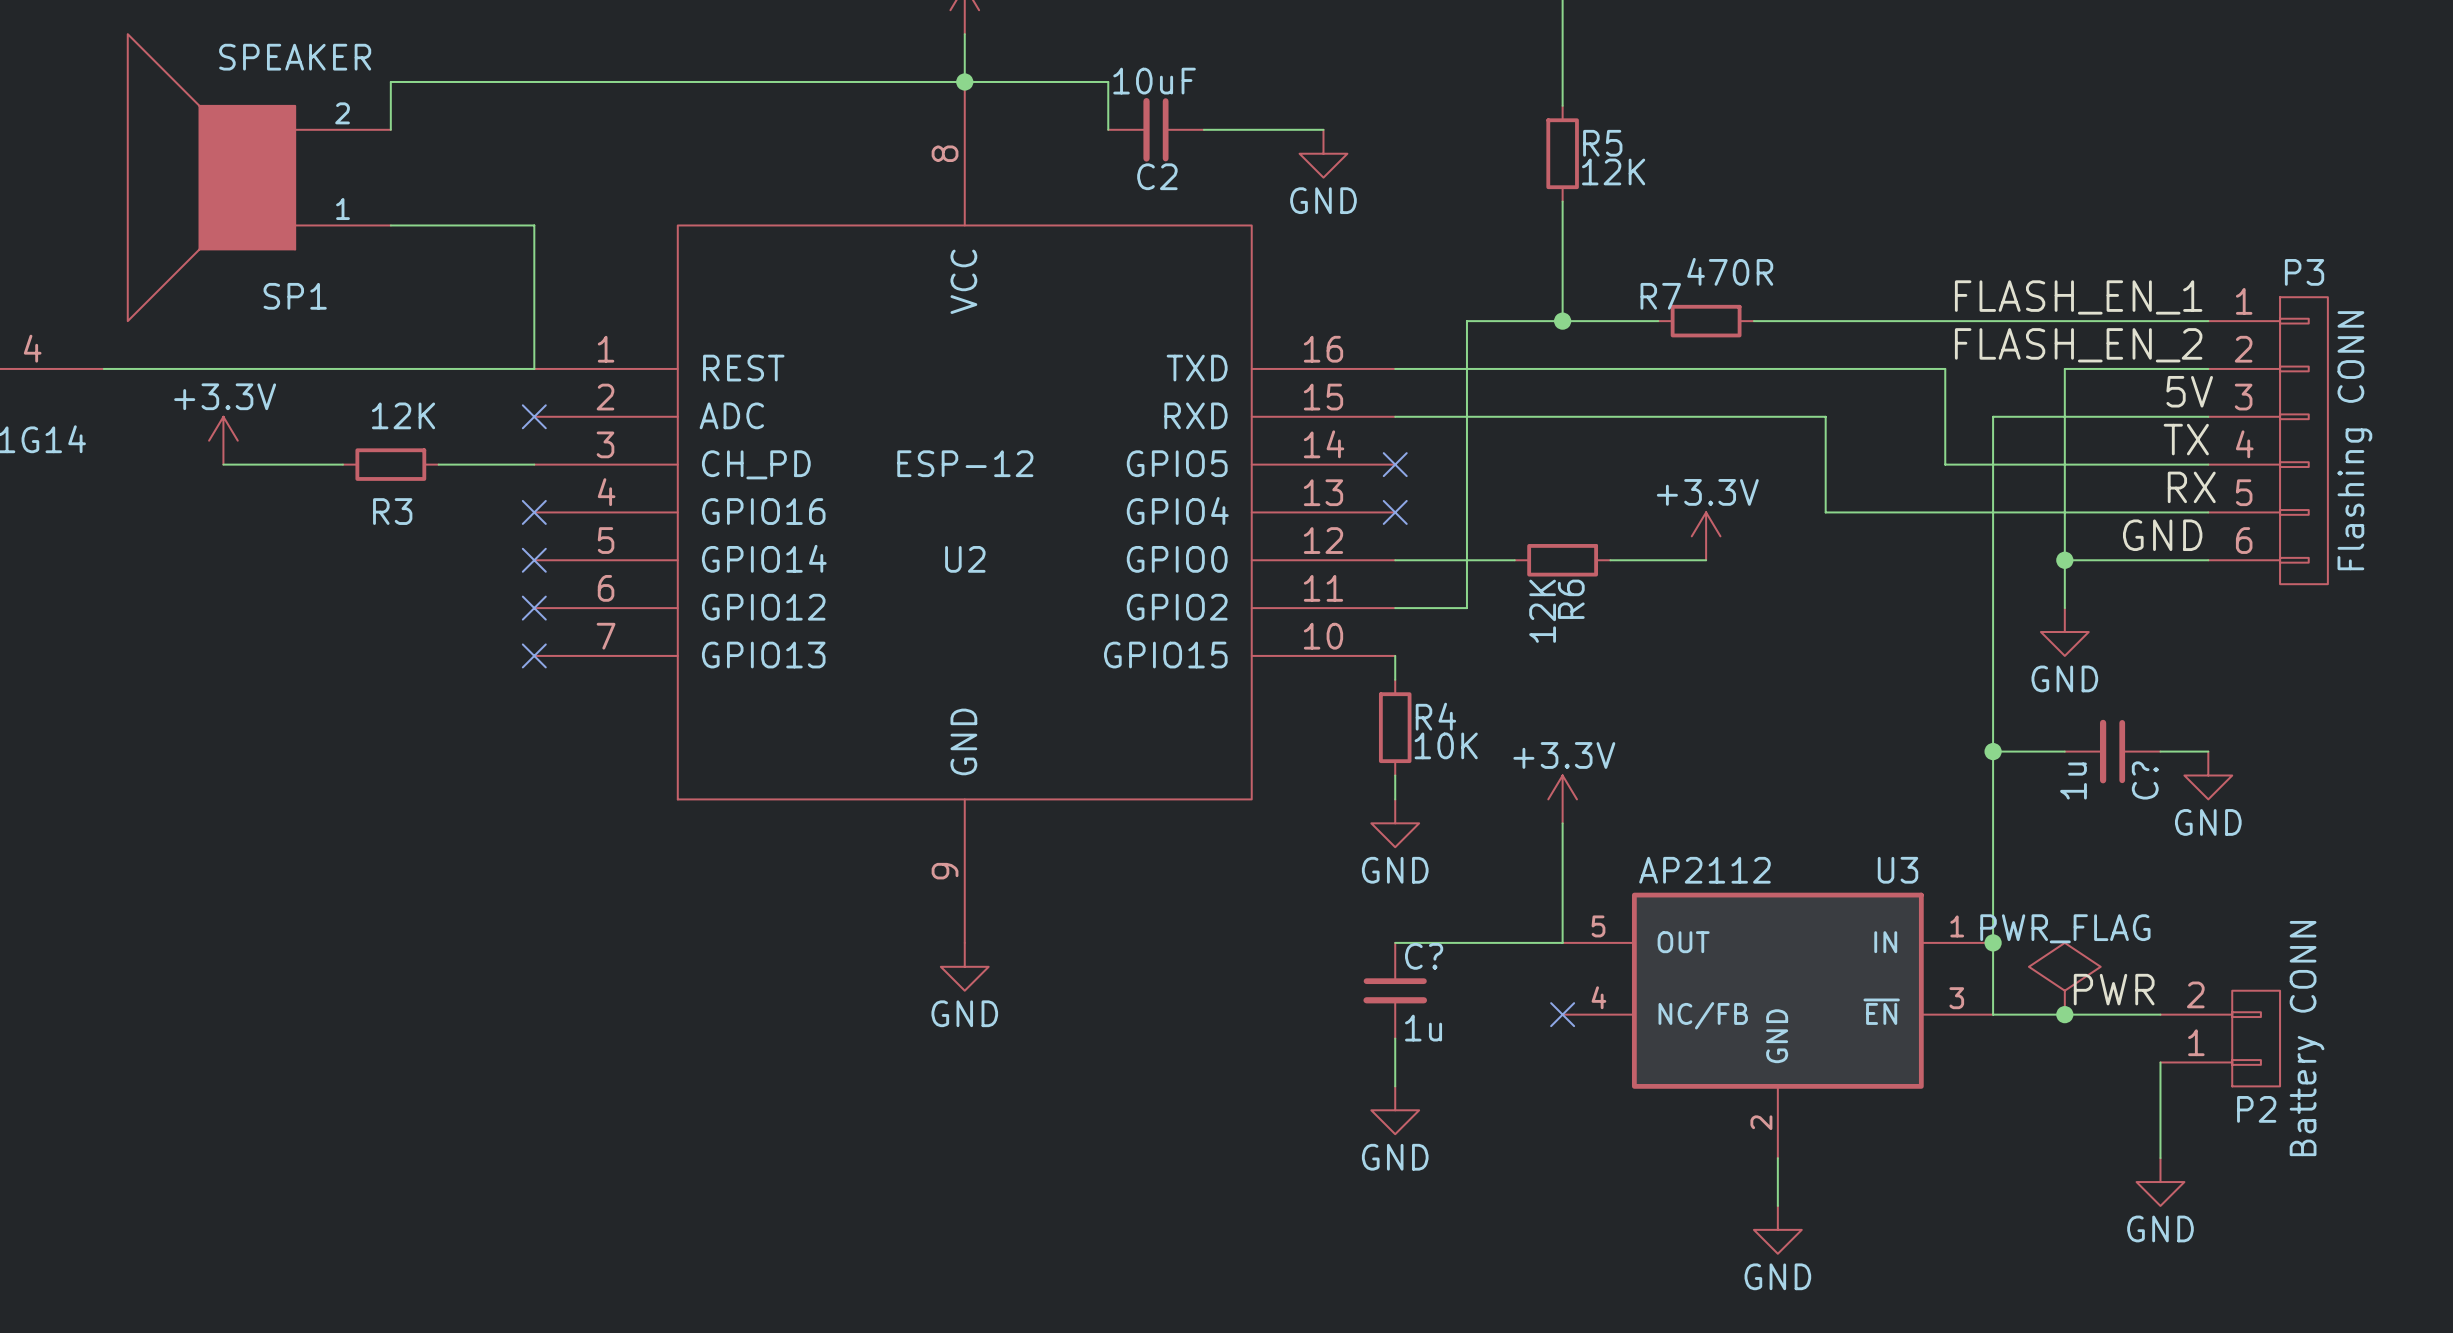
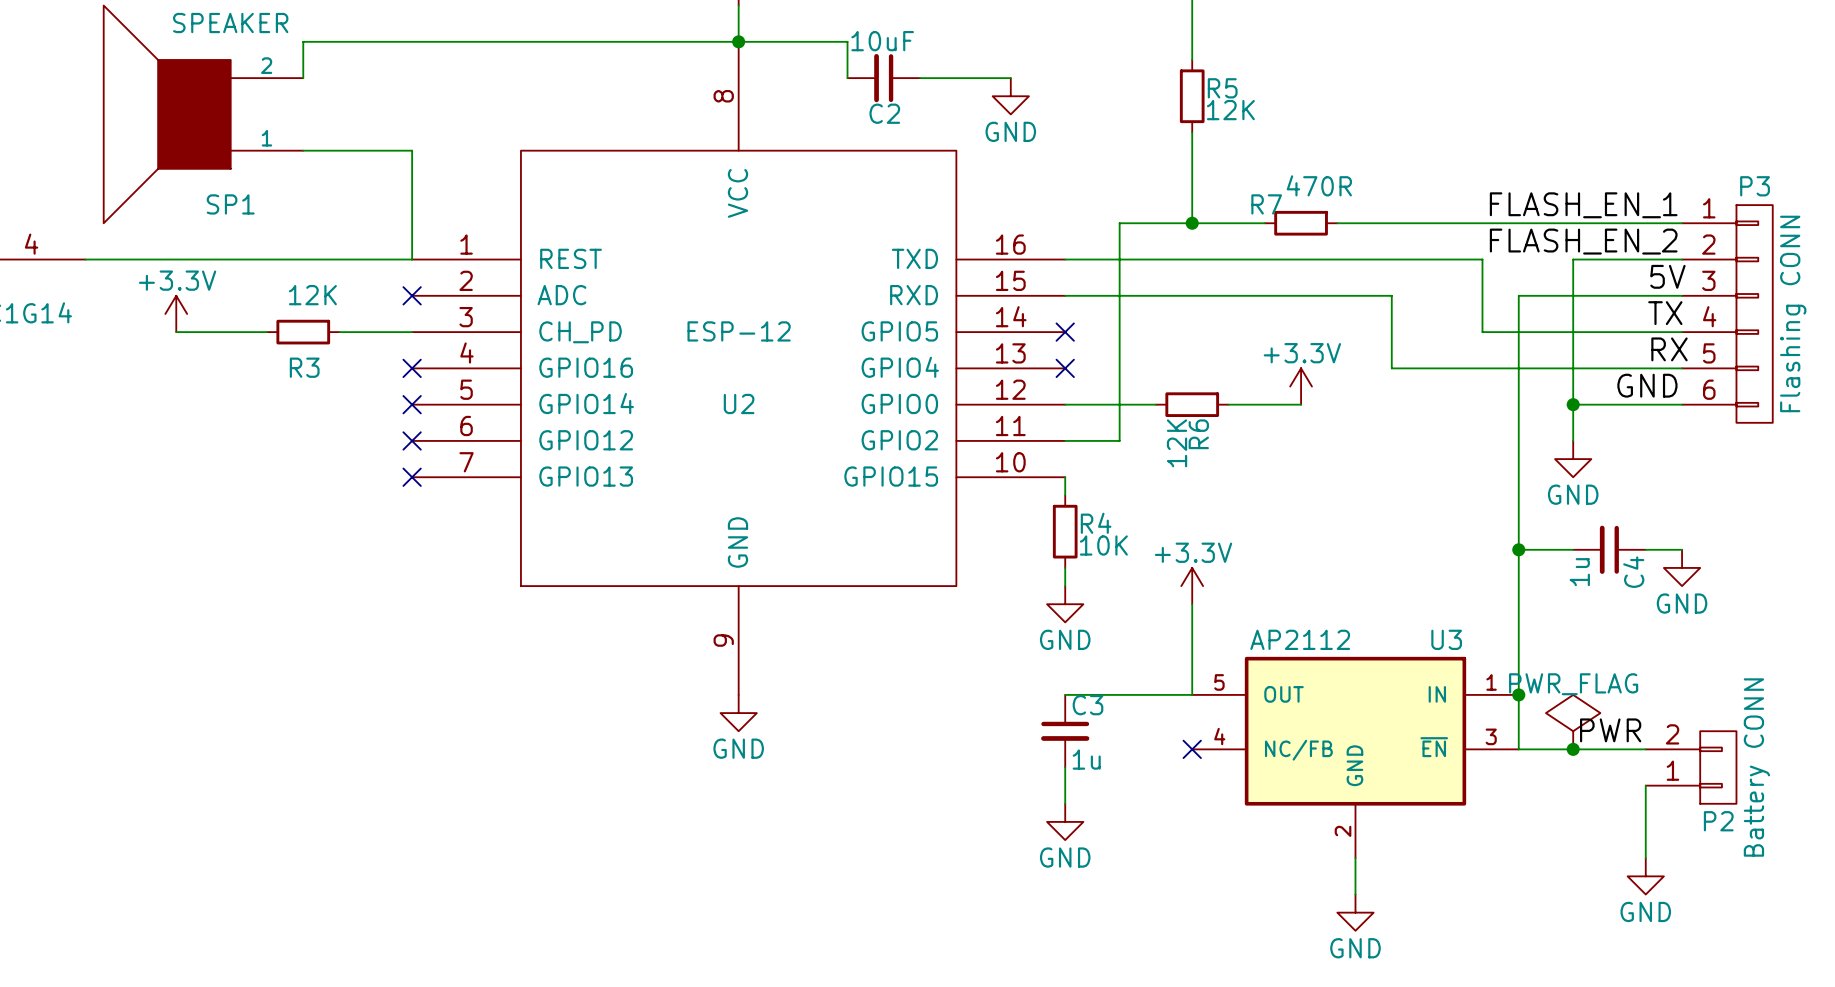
C? name: C? (2145, 780) -> C4 (1633, 572)
C? name: C? (1424, 956) -> C3 (1087, 705)

